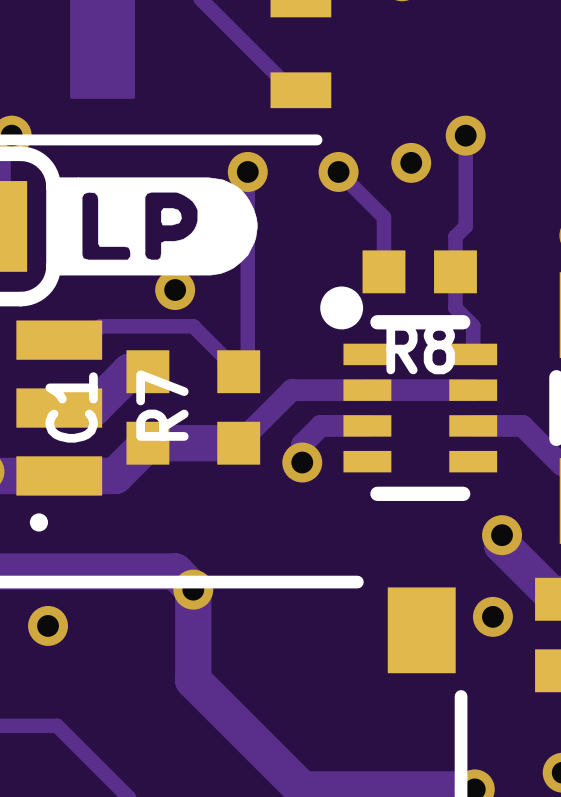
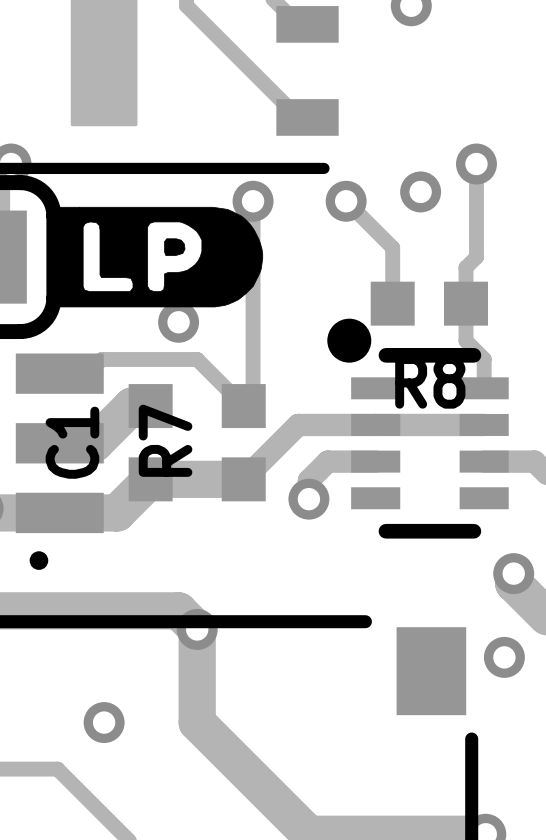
via position: (48, 625) -> (104, 722)

